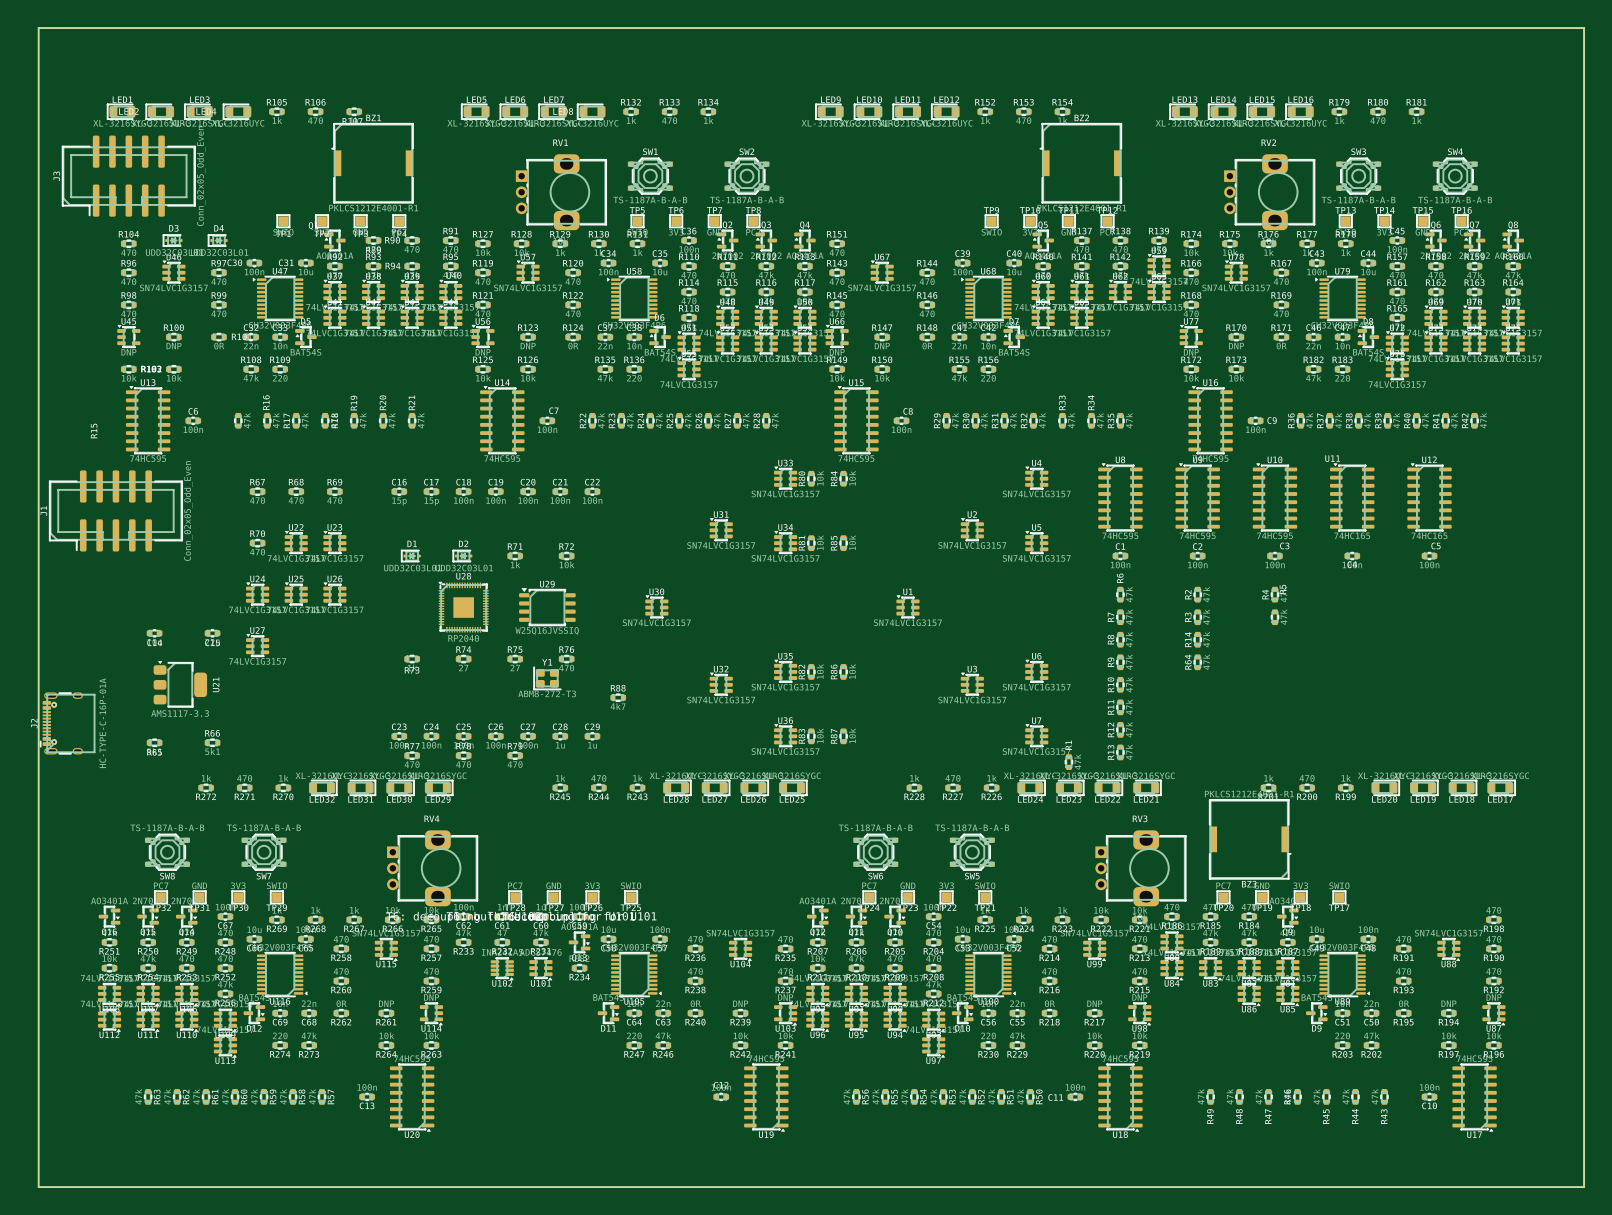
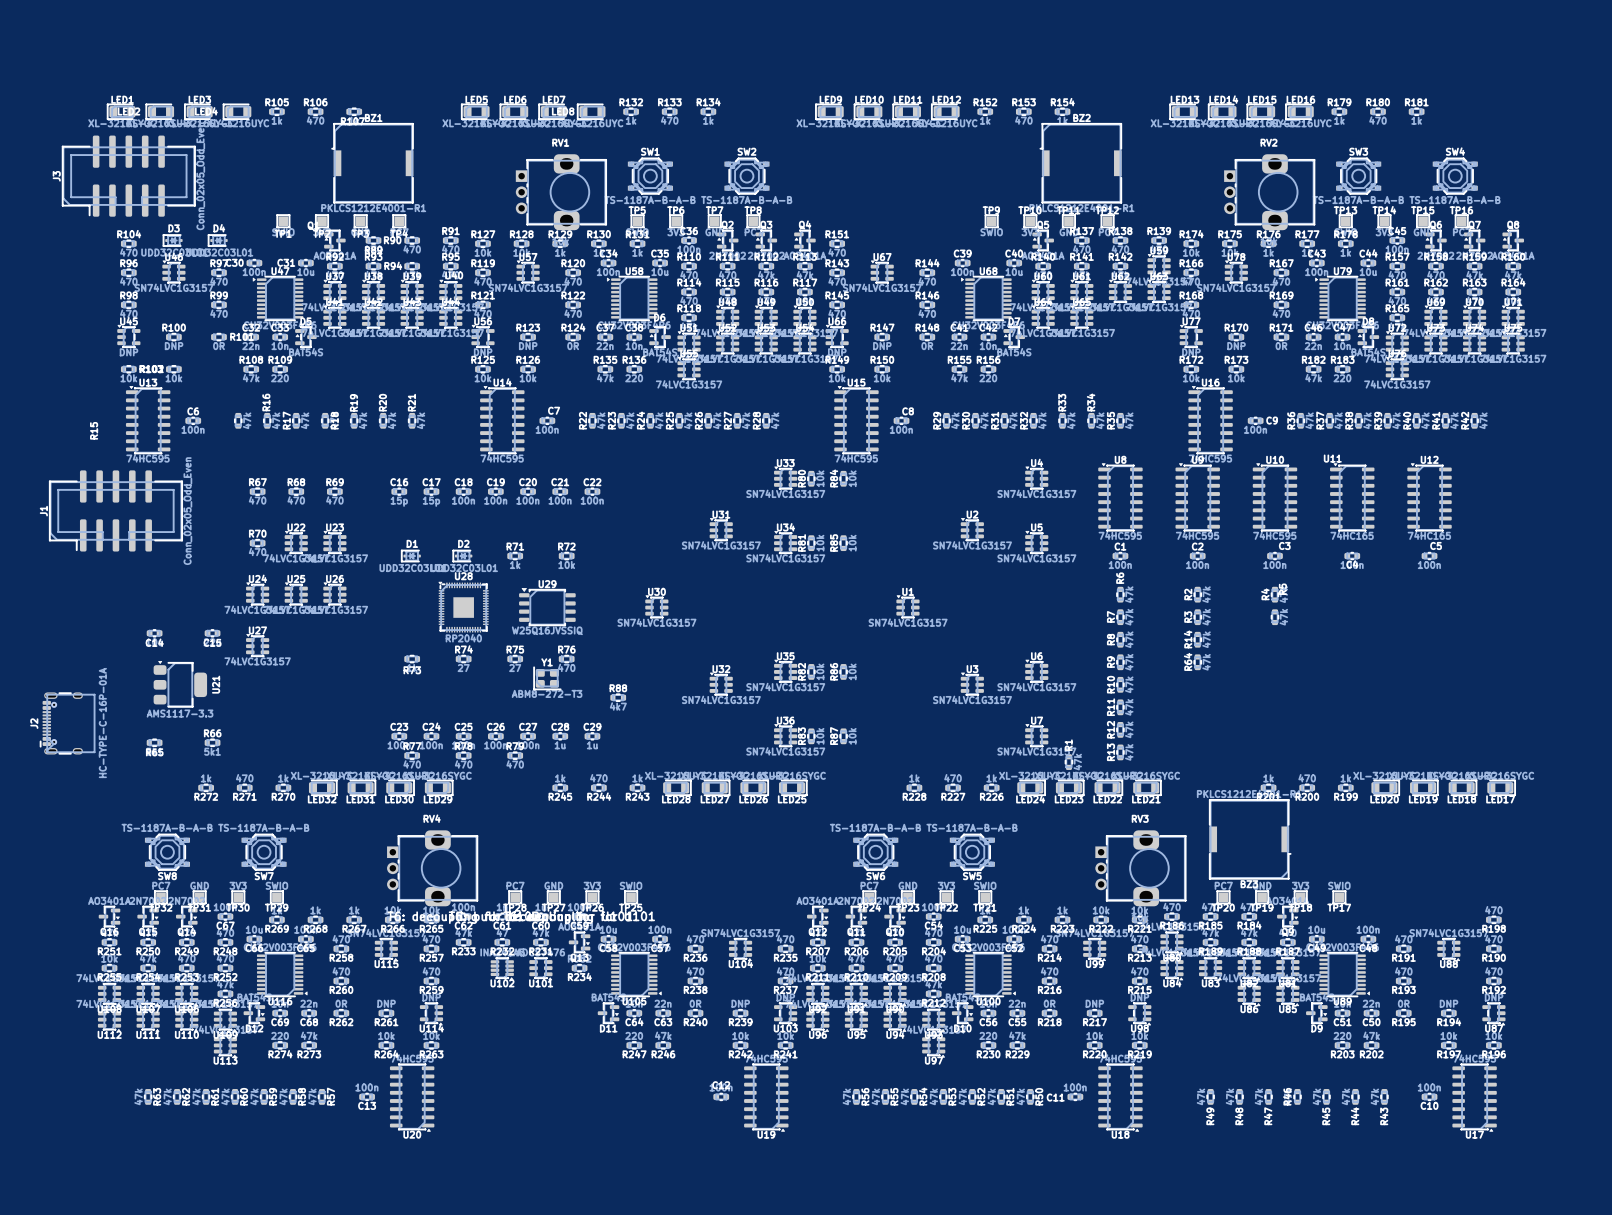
board edge: (38, 28) (1584, 28) (1584, 1187) (38, 1187) (38, 28) -> none

